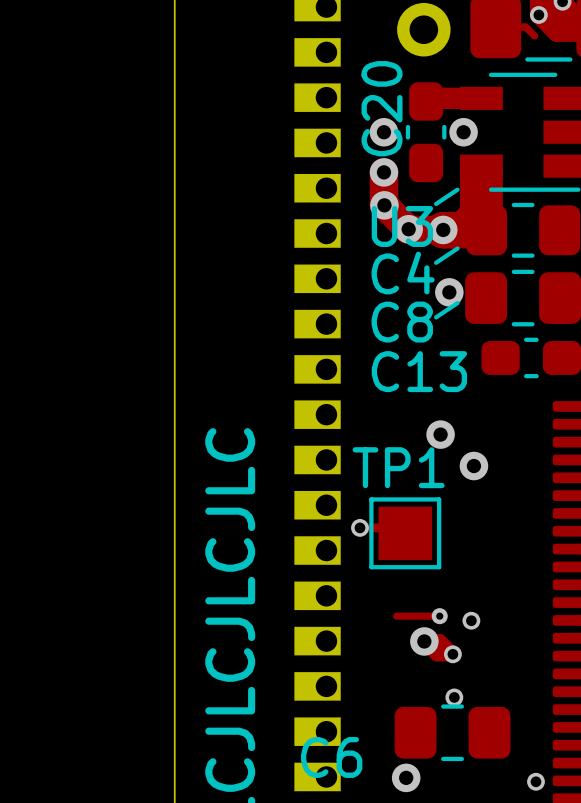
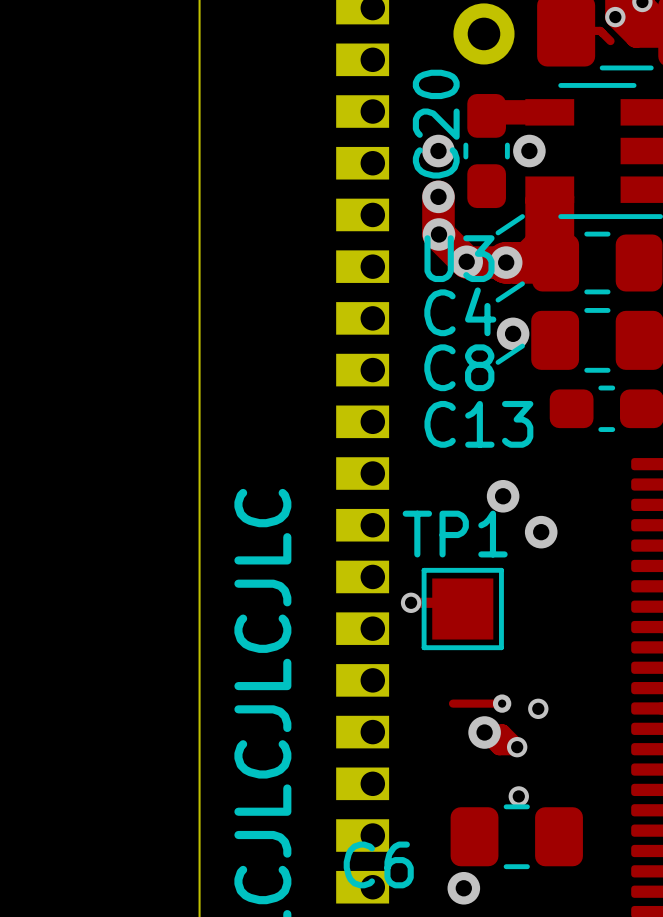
via: (535, 781) -> none

